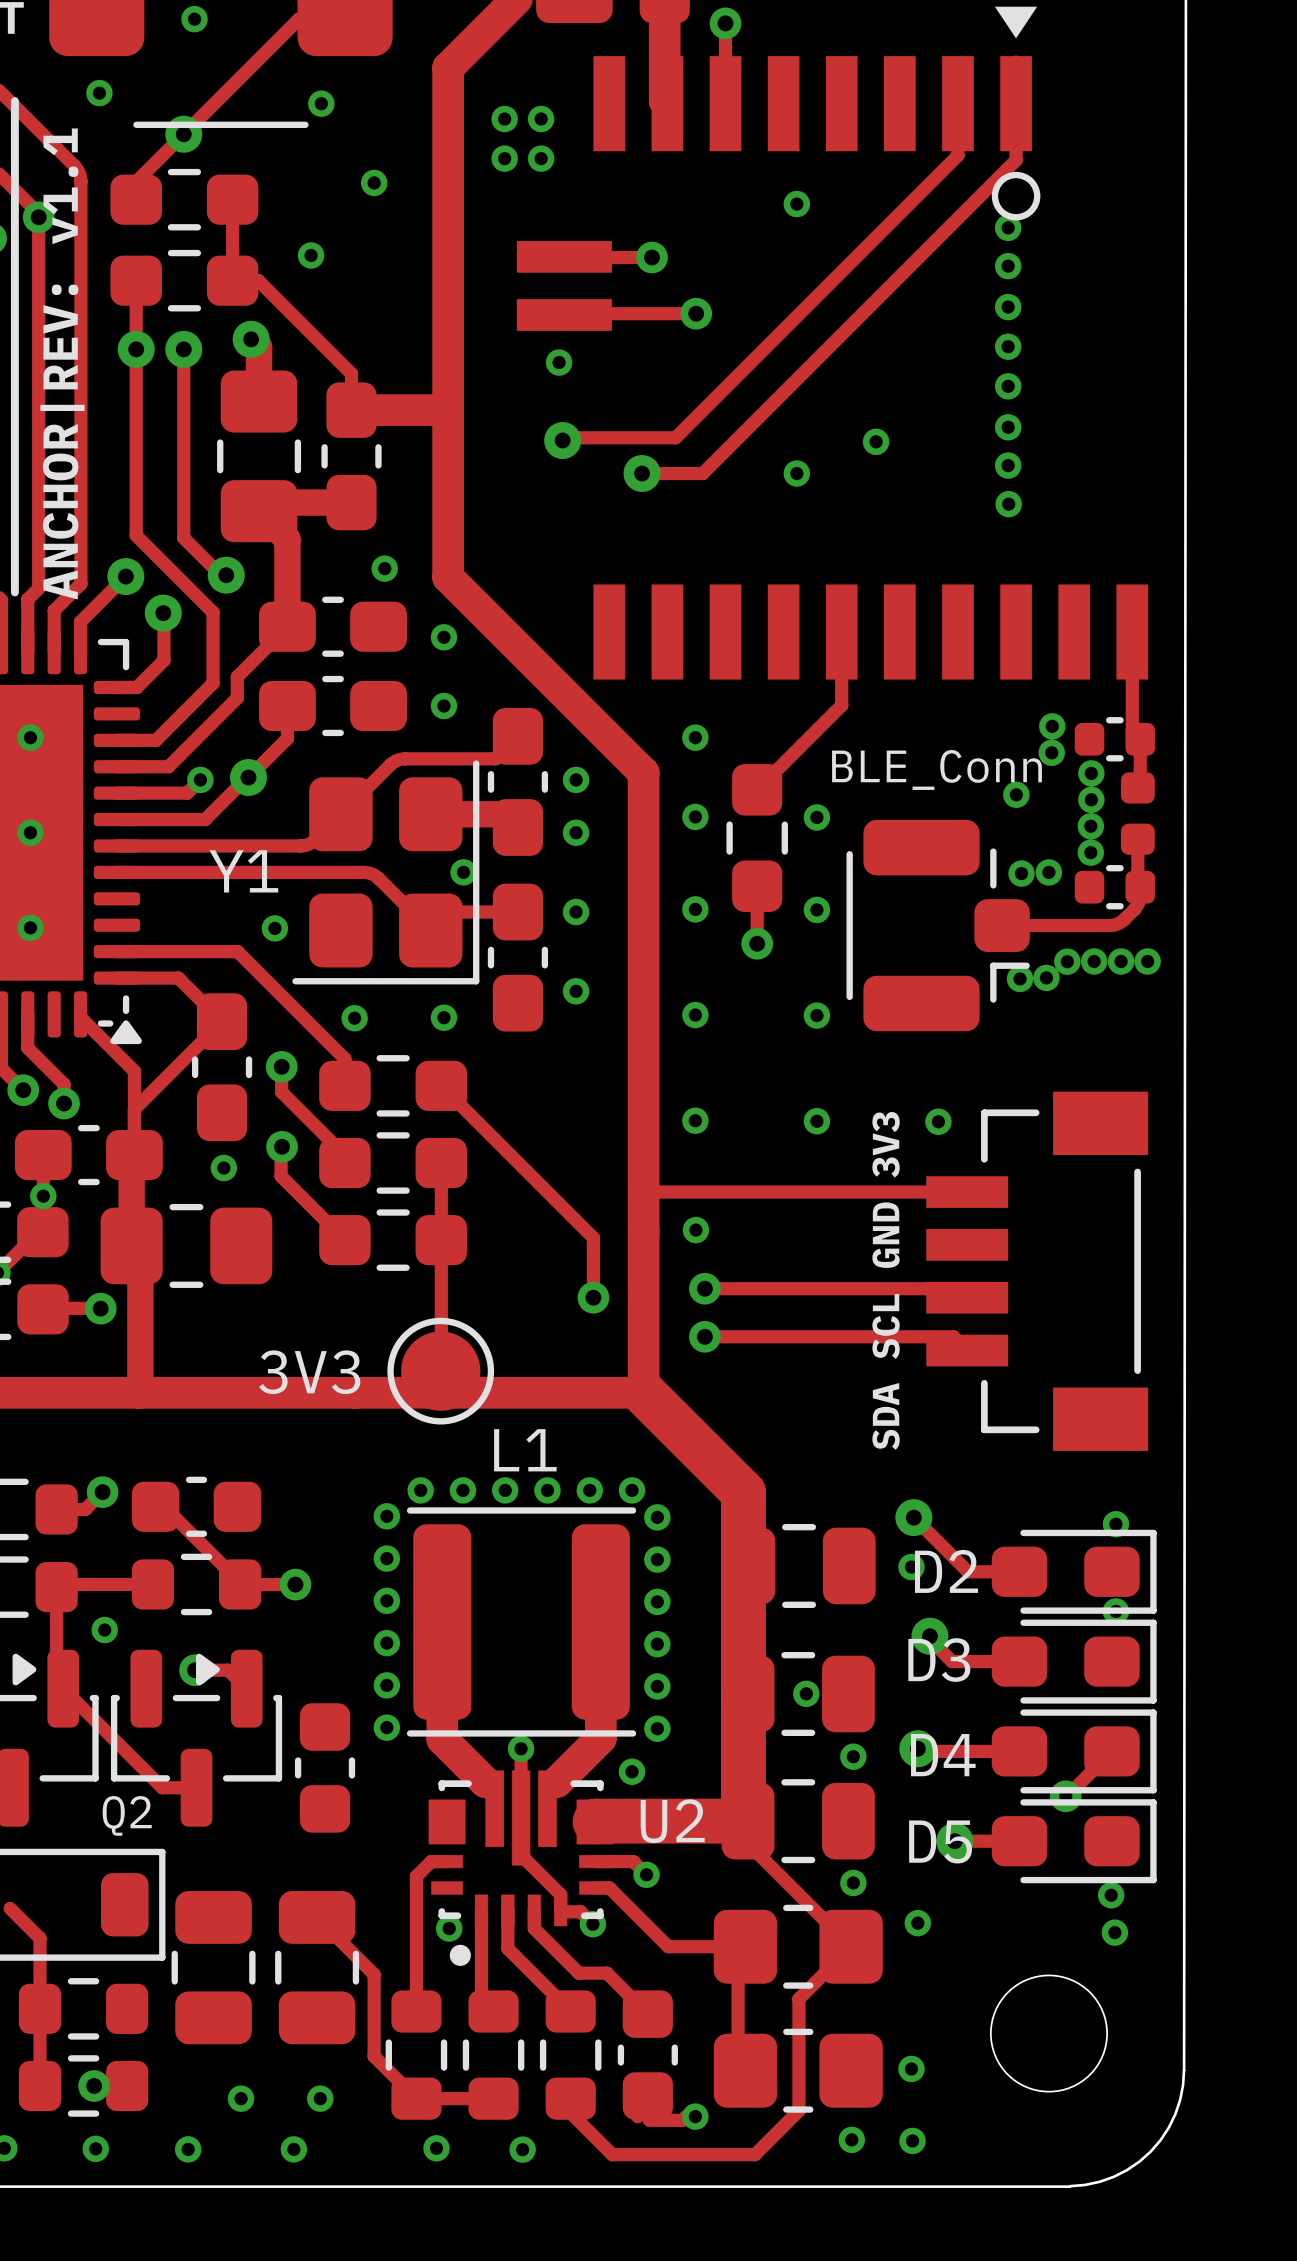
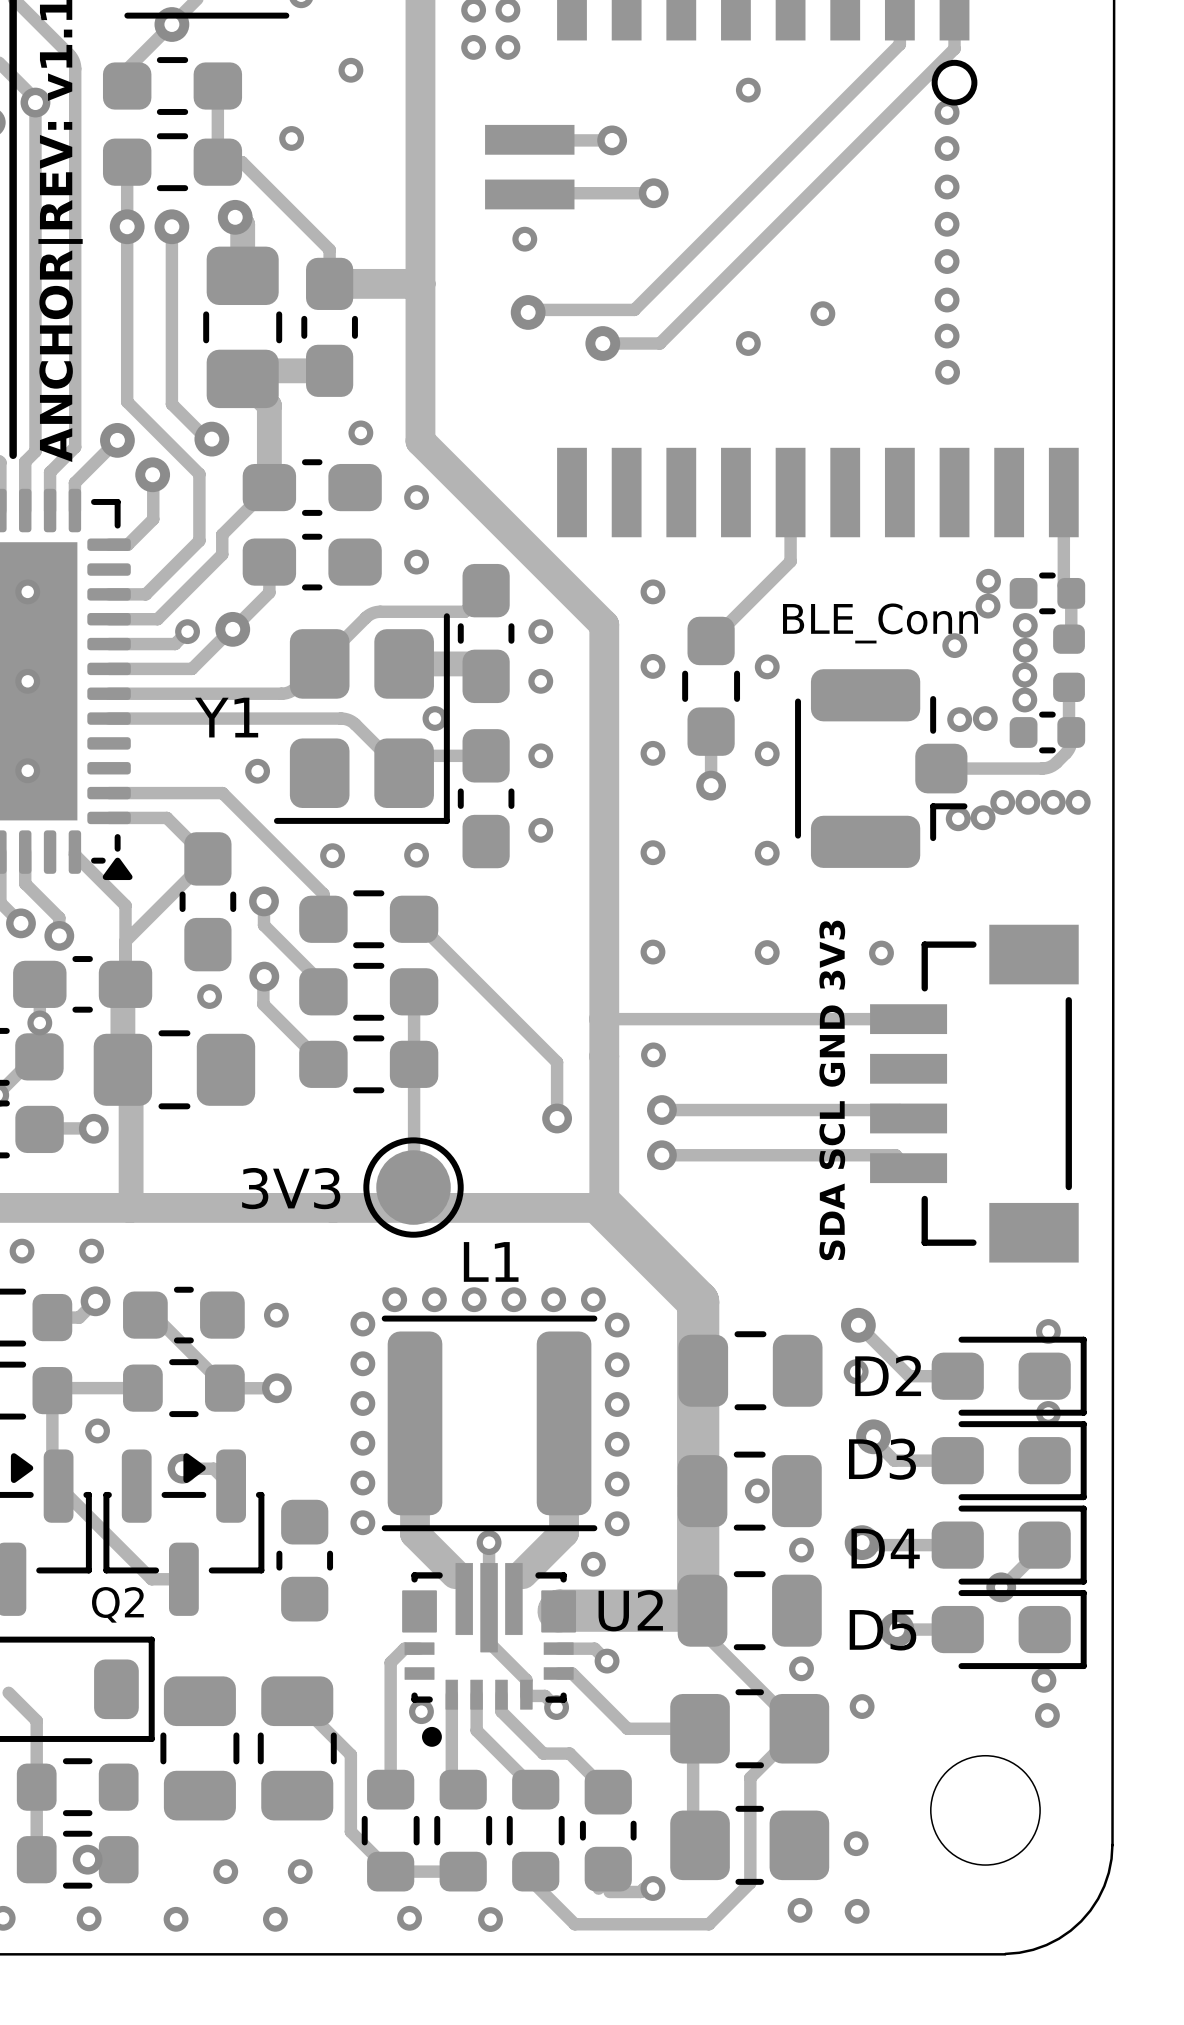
via: none -> (22, 1251)
via: none -> (91, 1251)
via: none -> (276, 1315)

